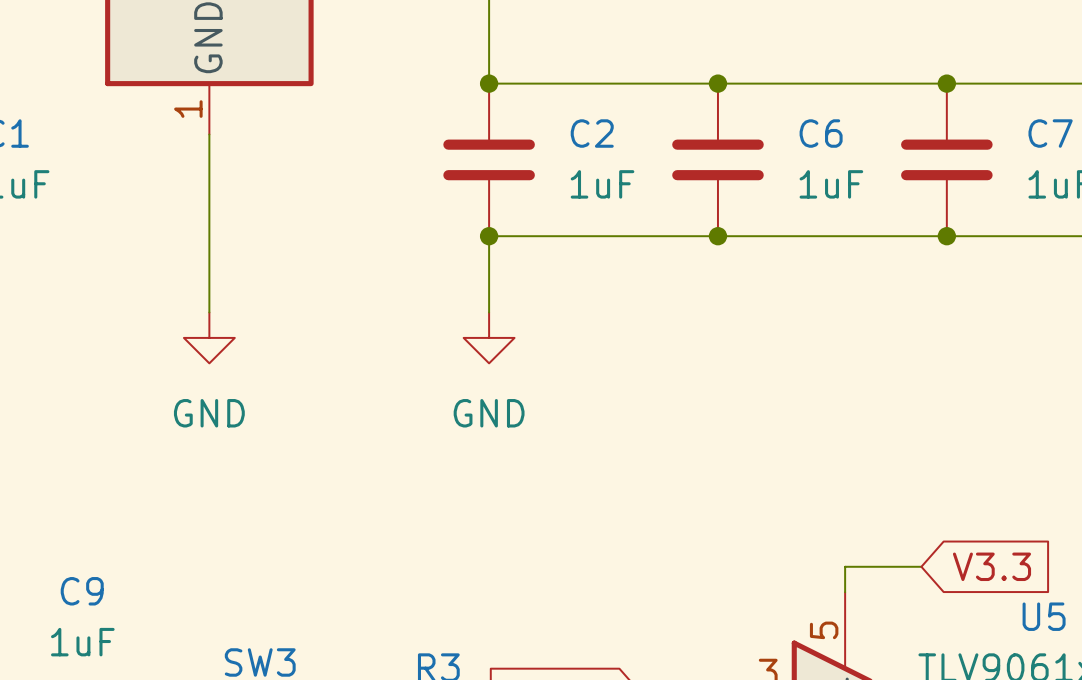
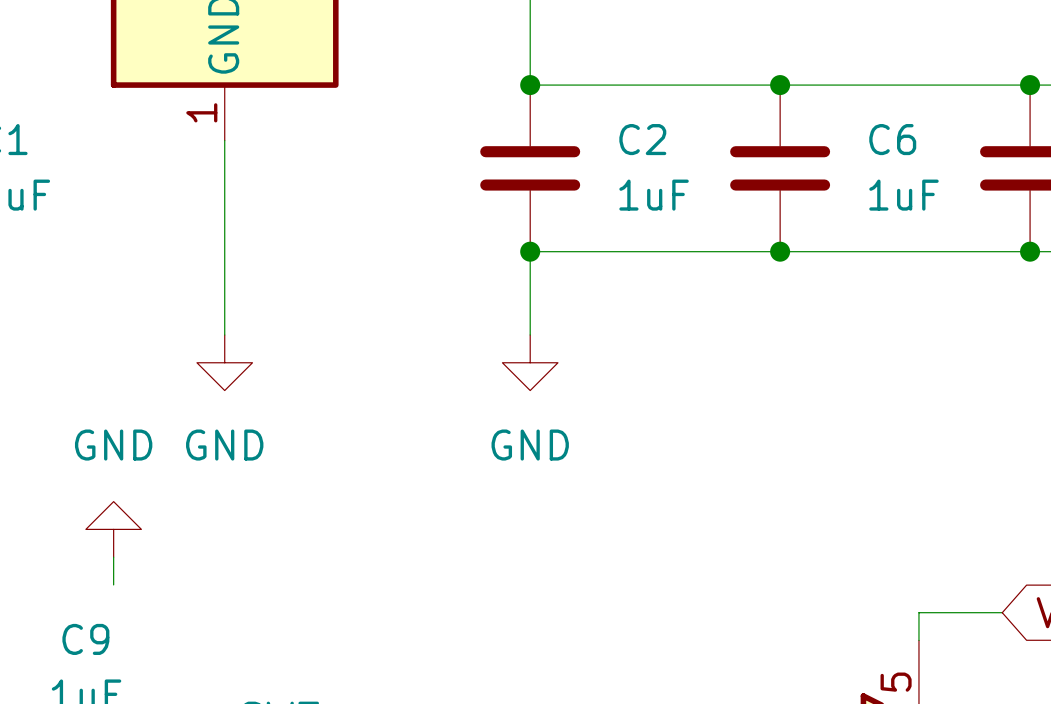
power symbol: none -> GND (113, 529)
wire: none -> (113, 557) (113, 584)

